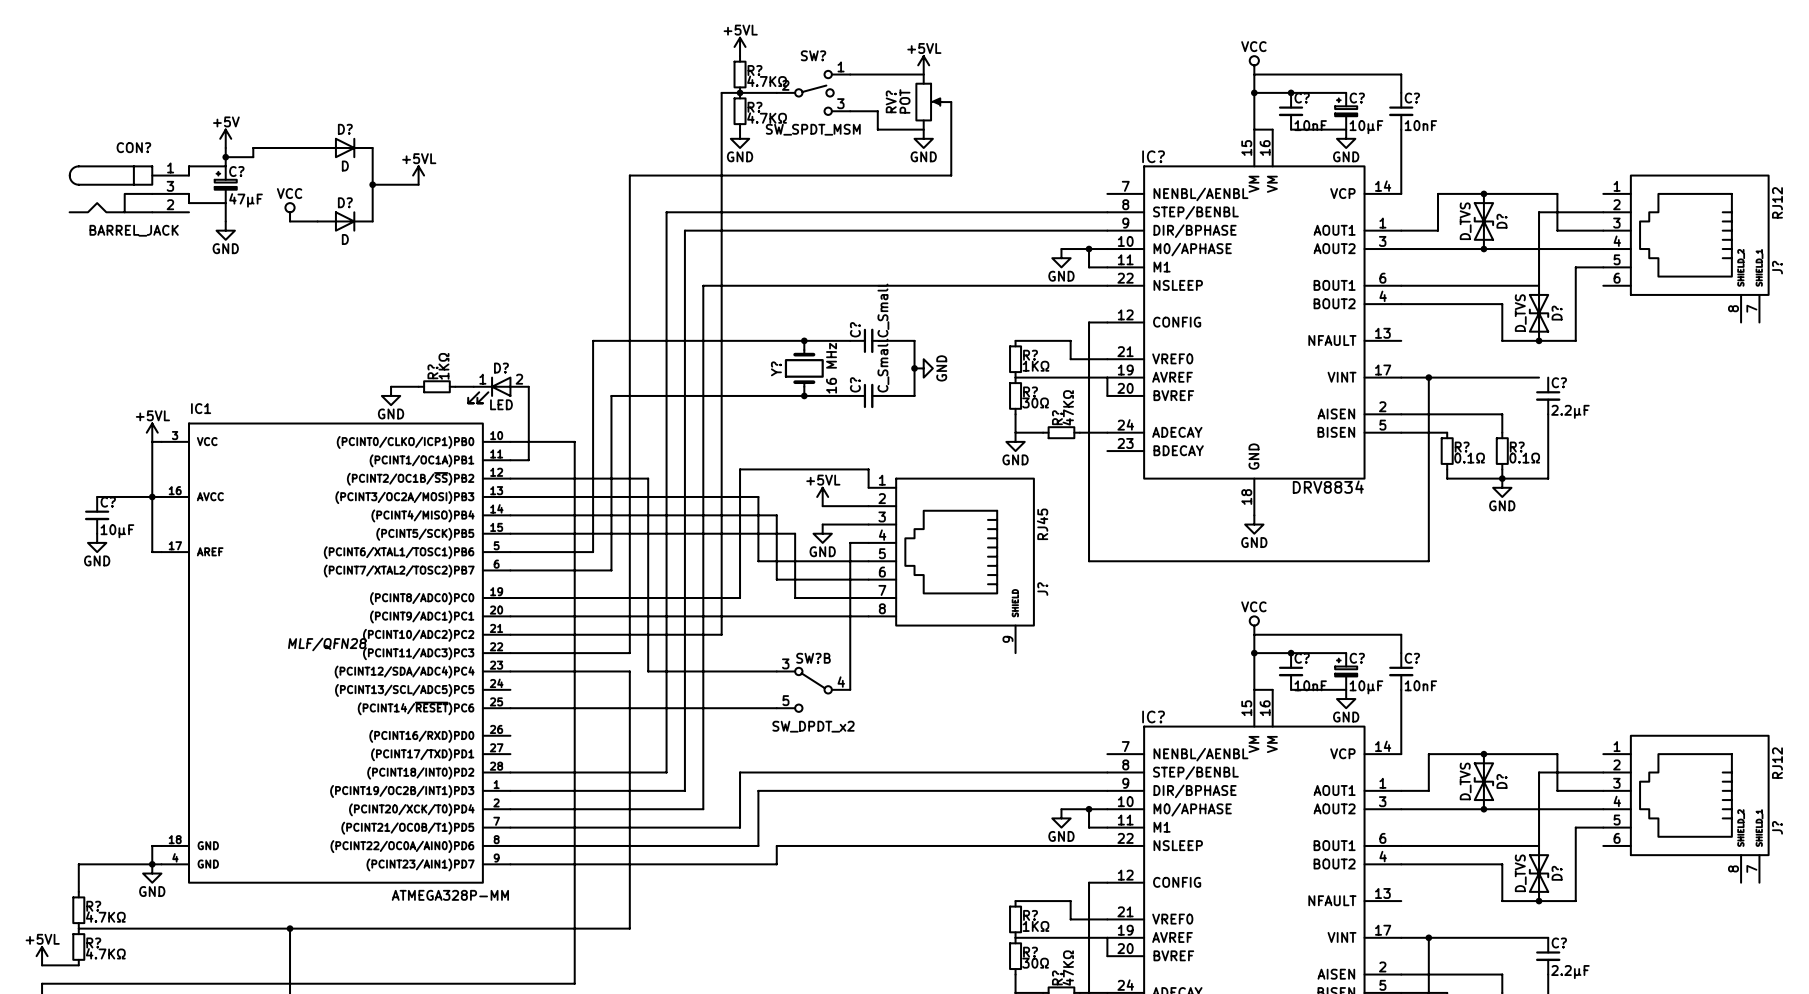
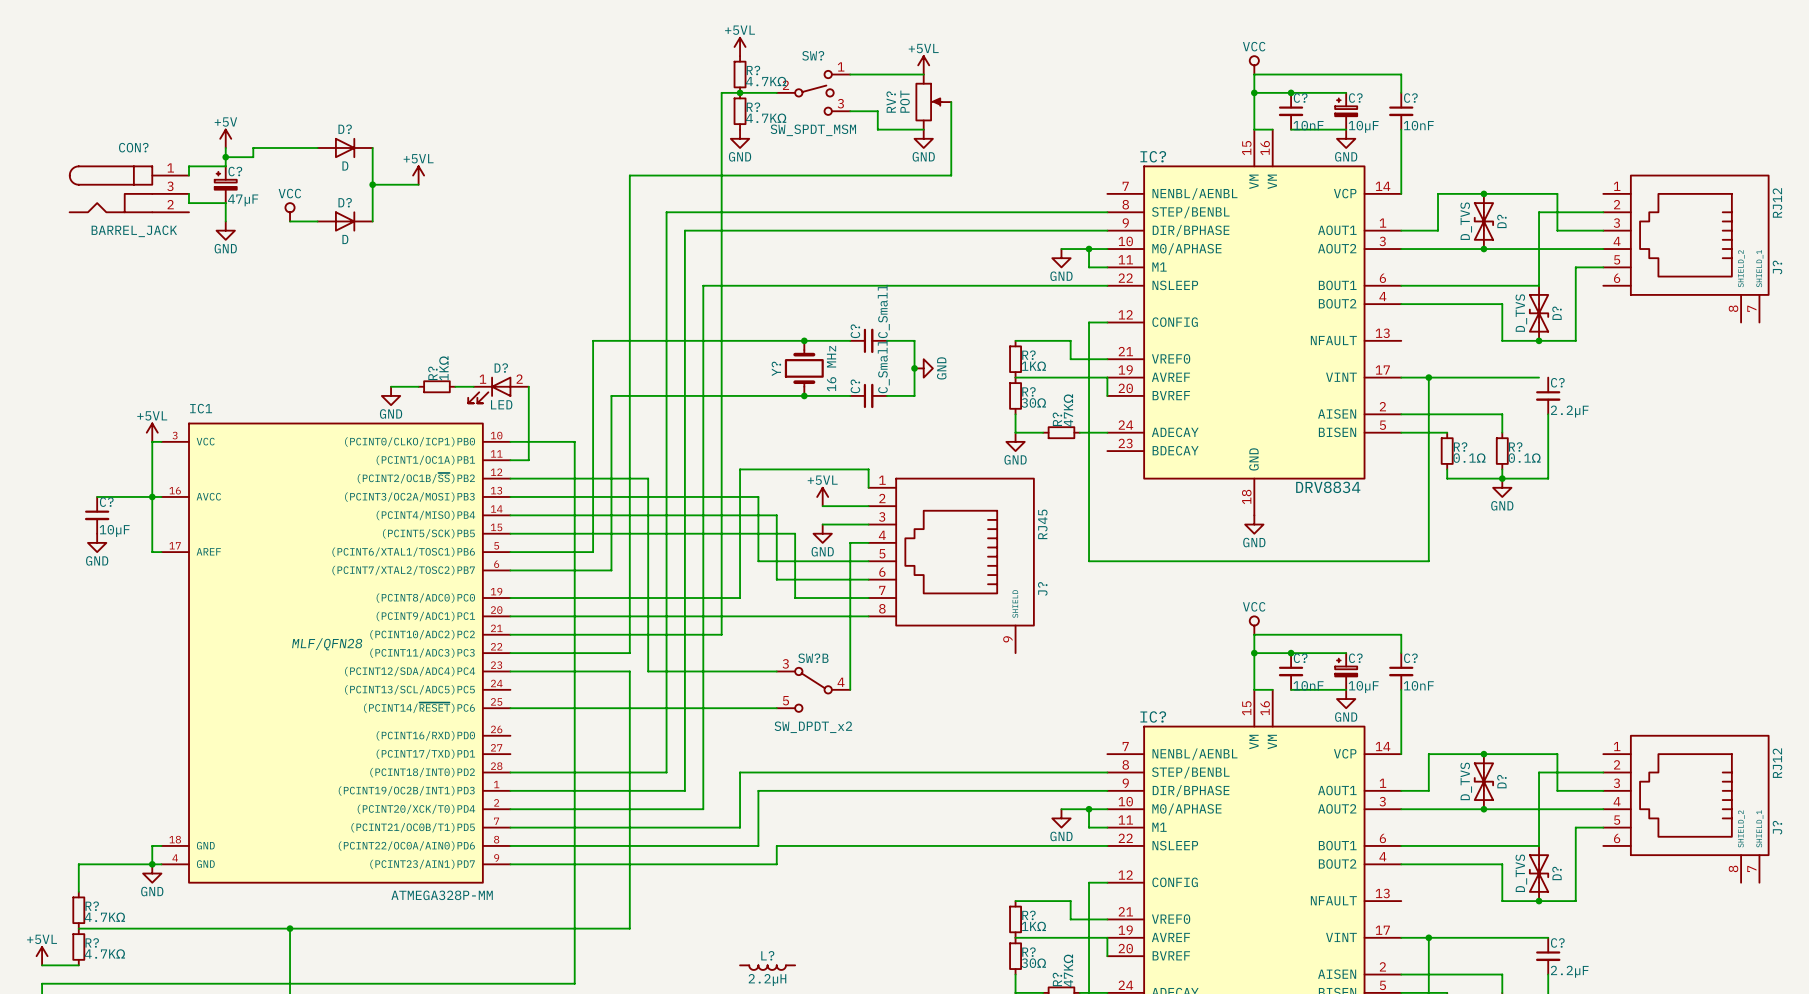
L?: none -> 2.2µH (767, 967)

